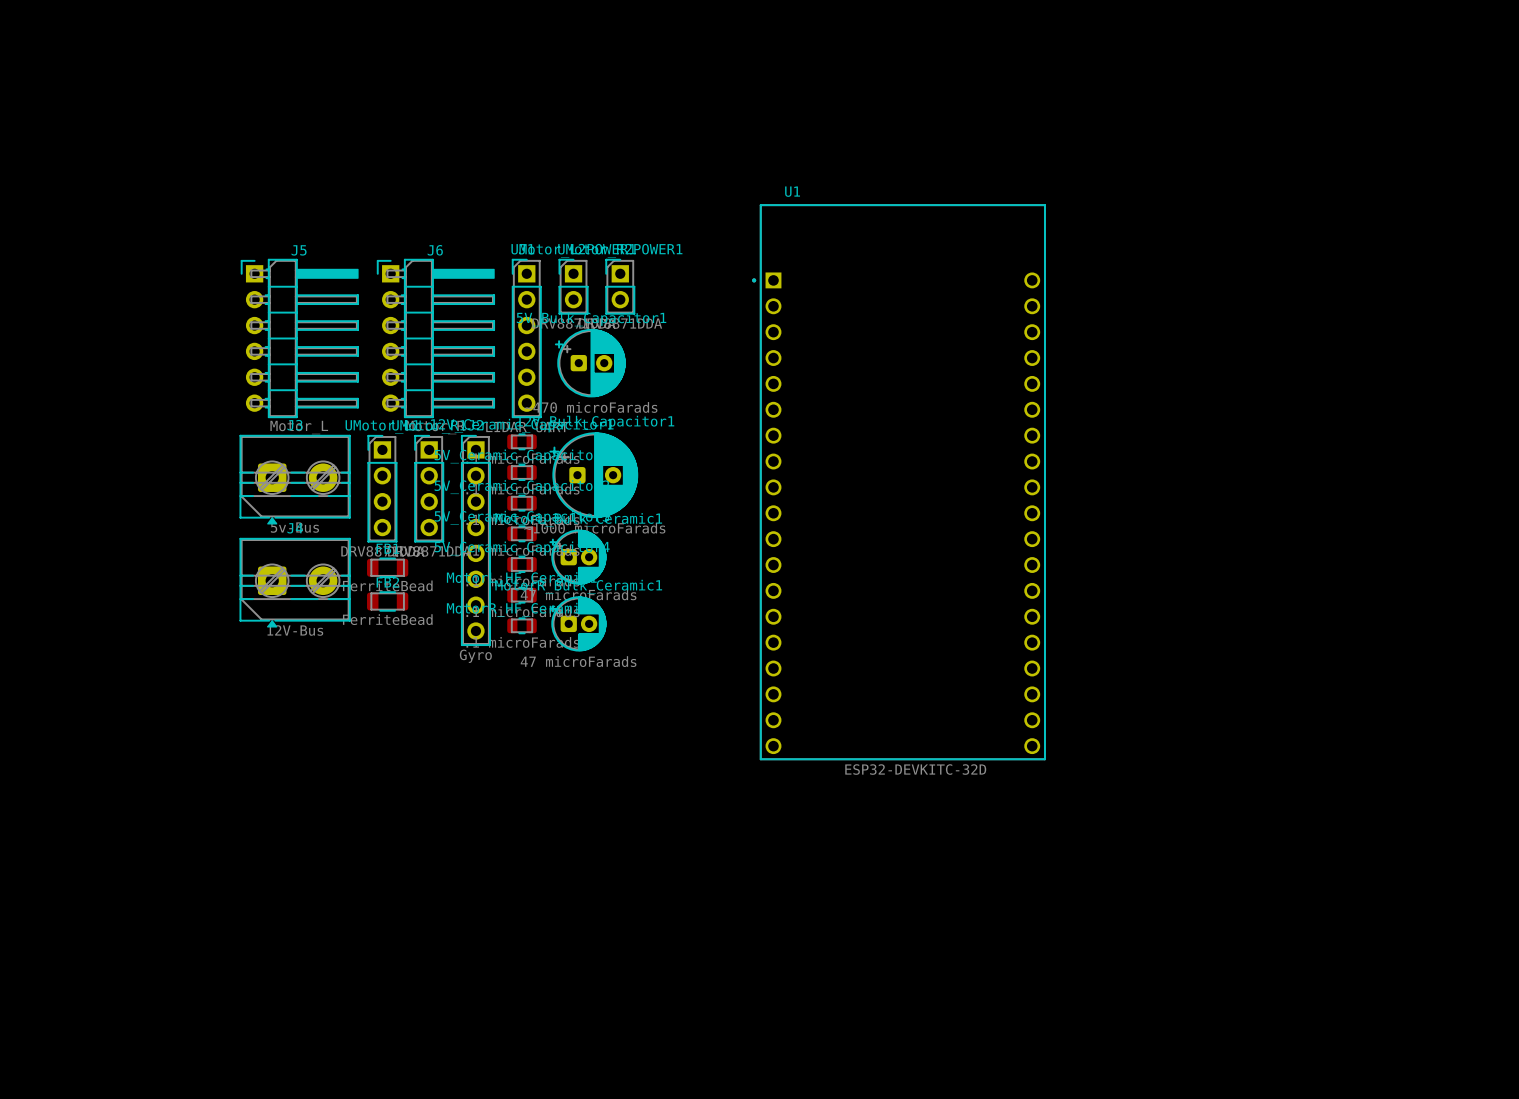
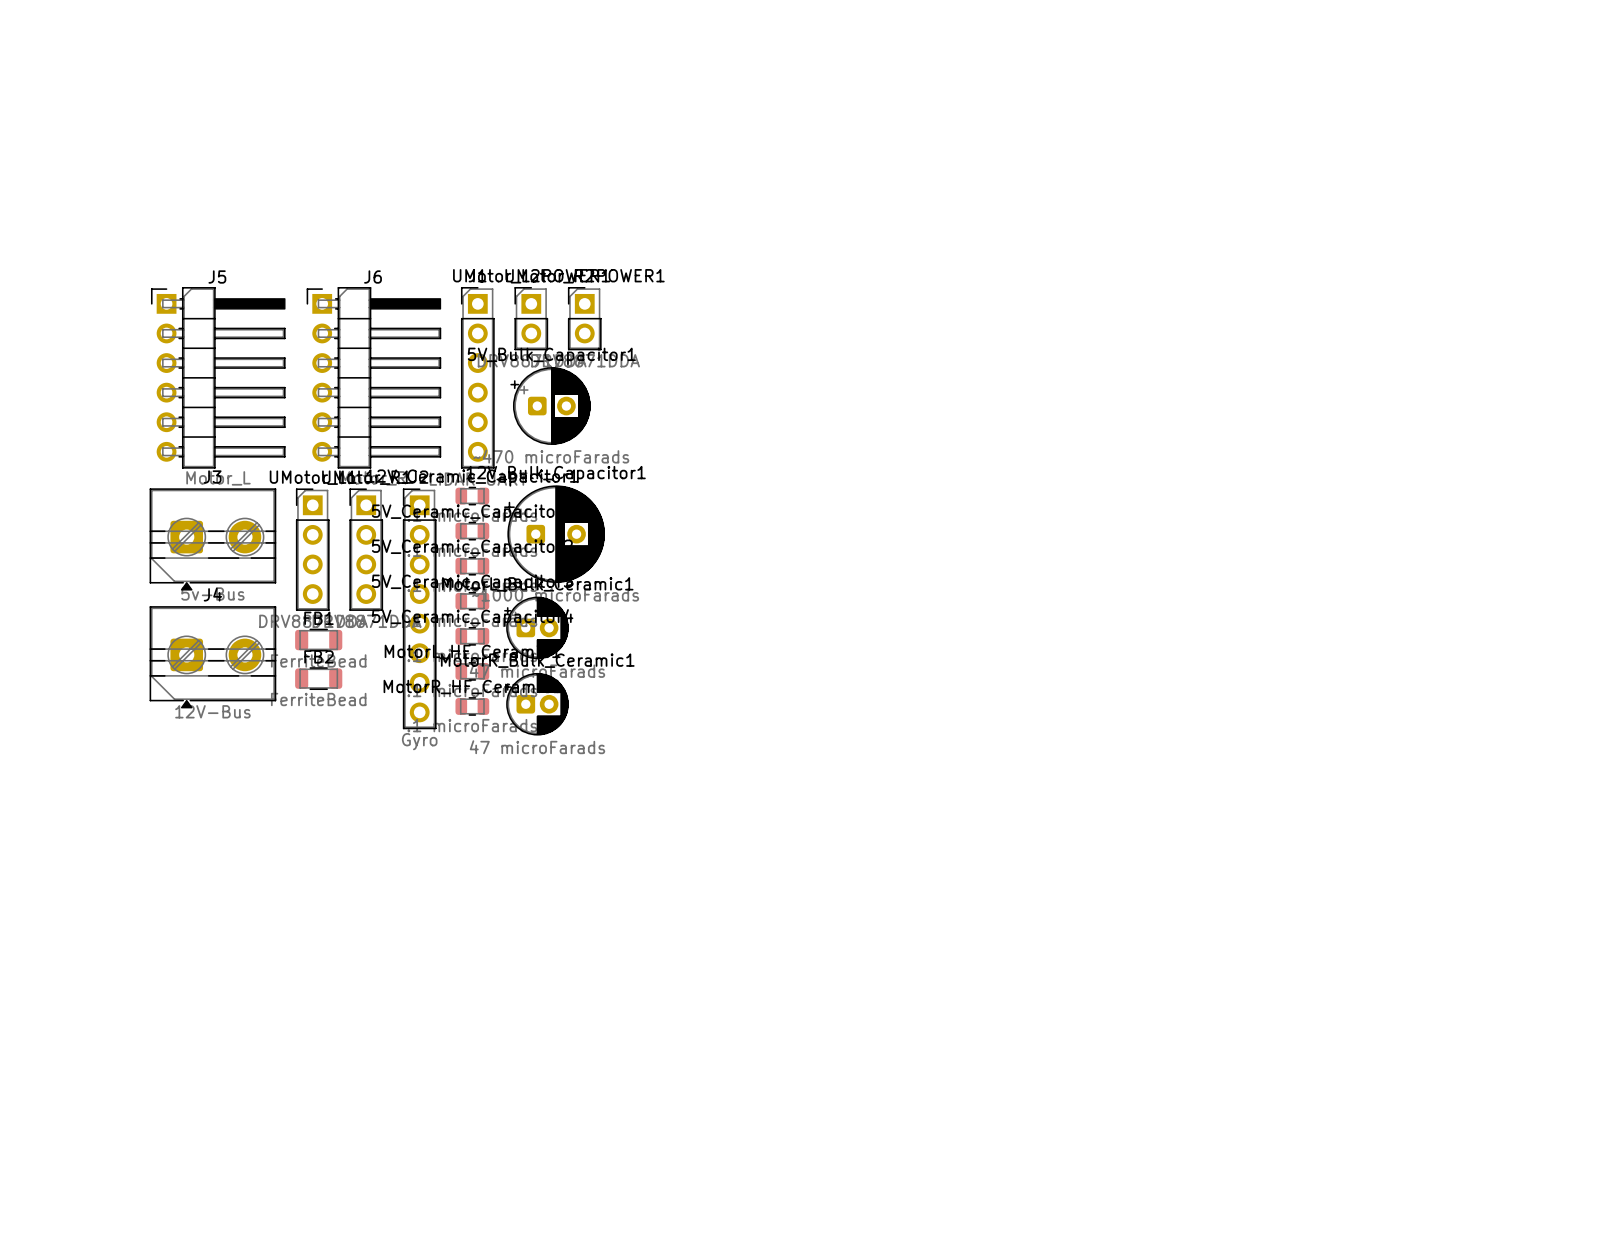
U1: ESP32-DEVKITC-32D (898, 482) -> none

